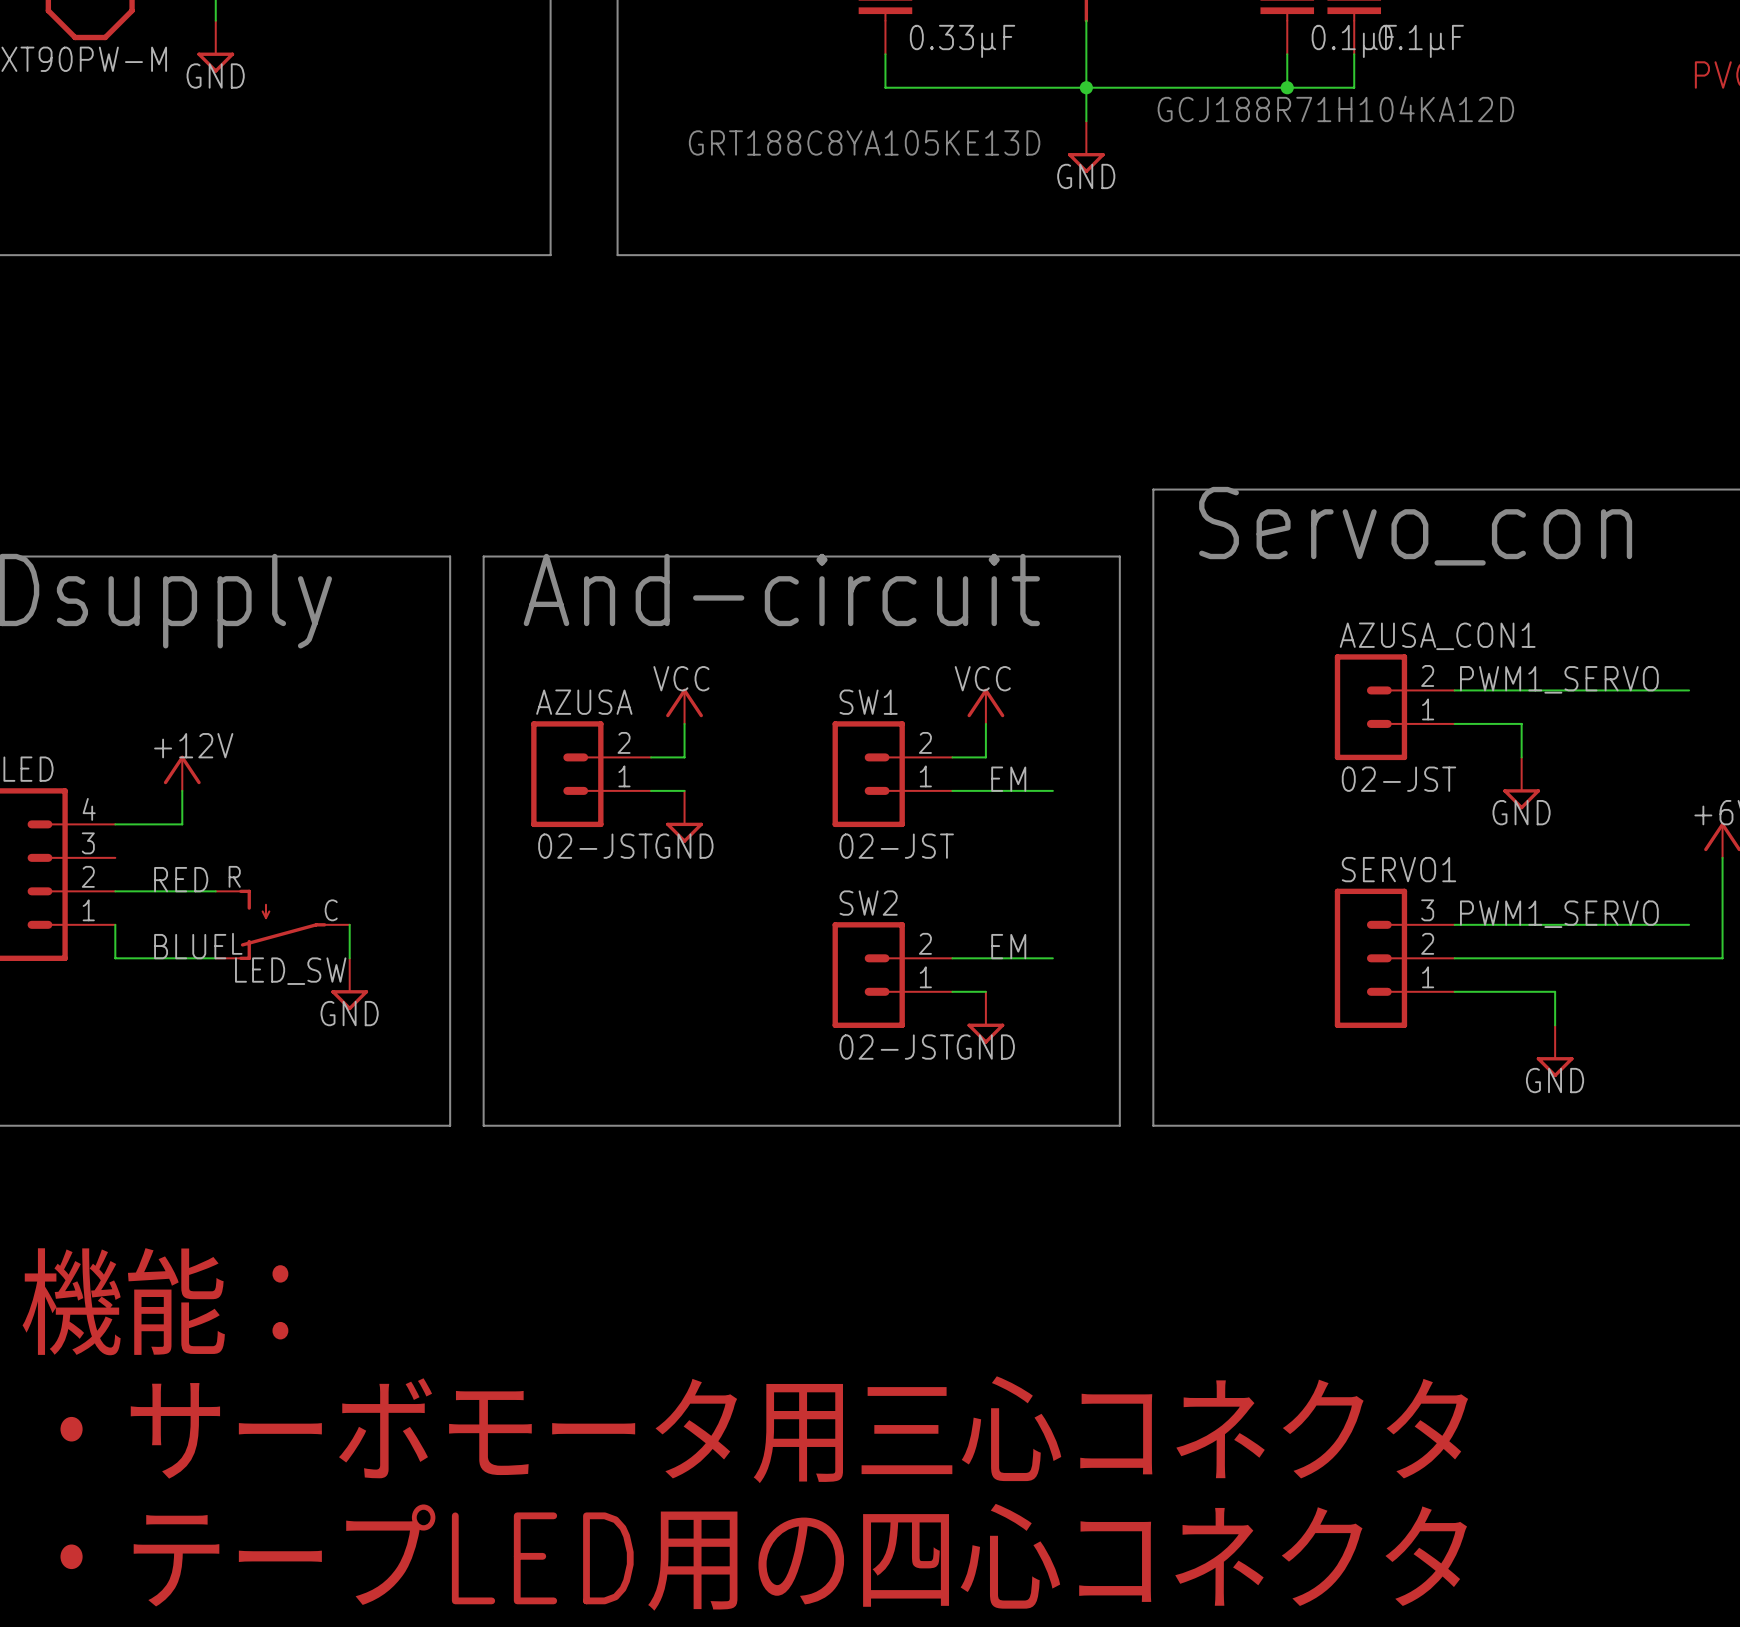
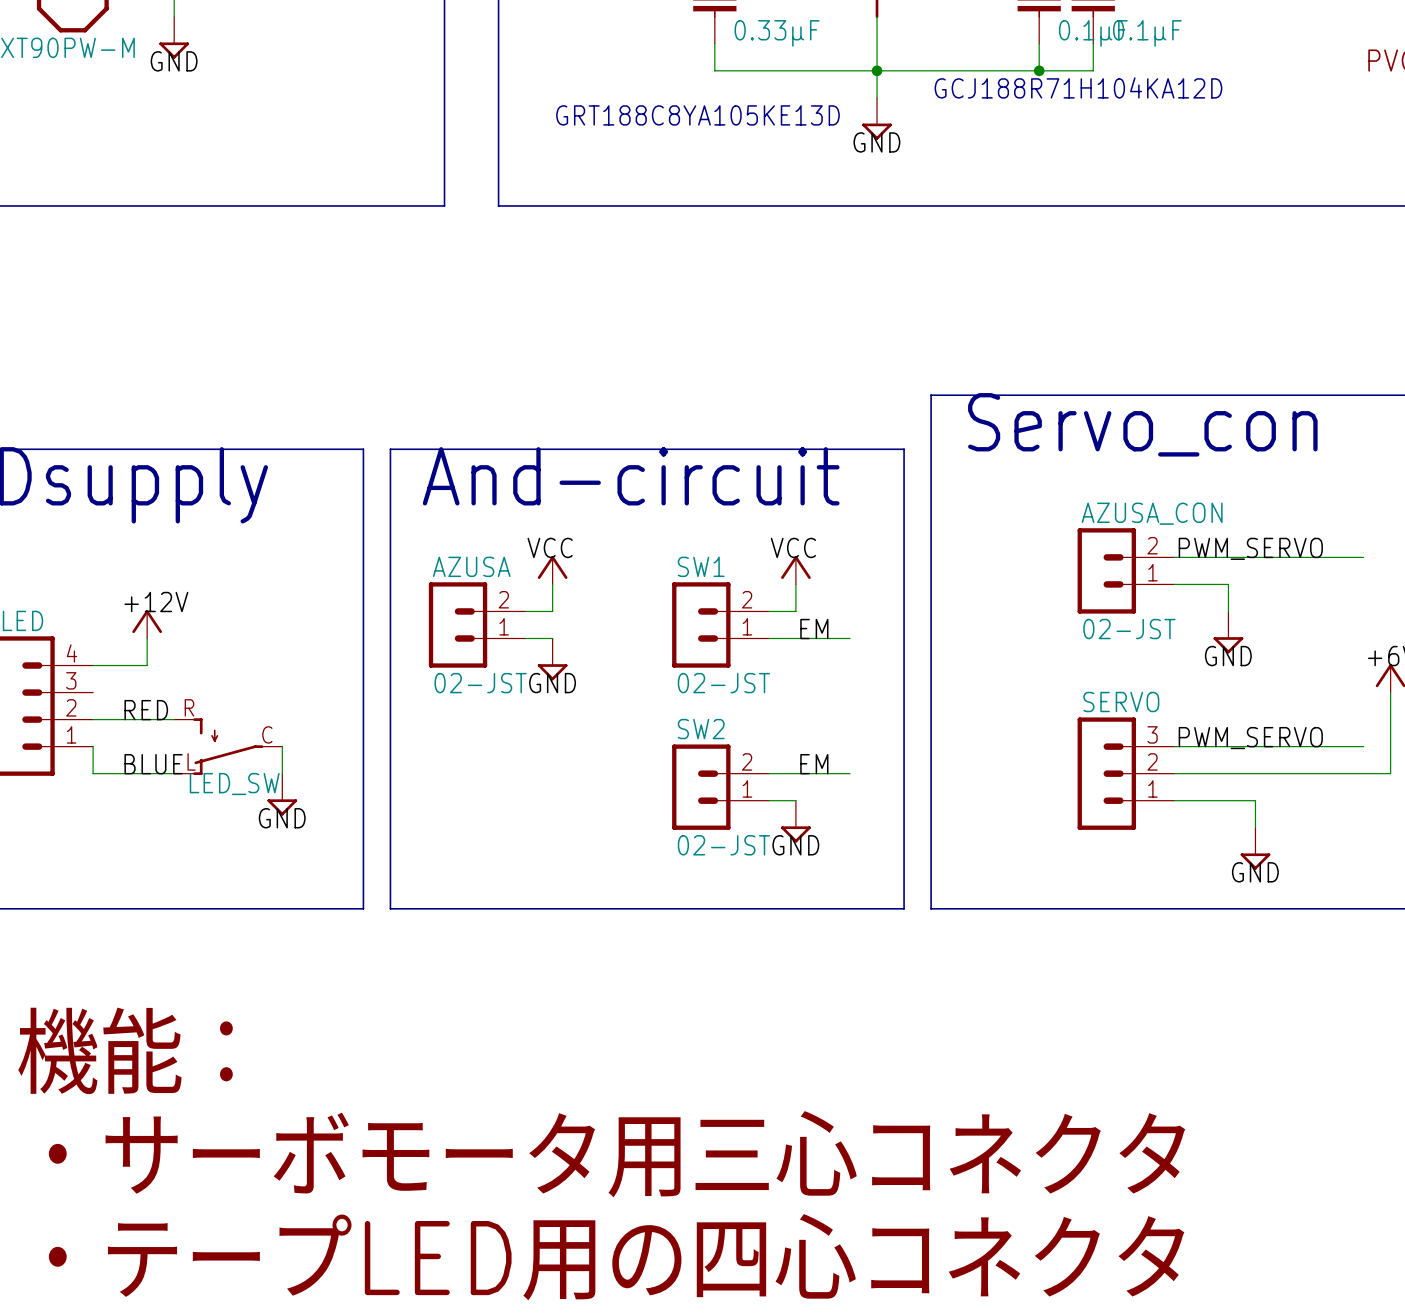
AZUSA_CON1 name: AZUSA_CON1 (1437, 636) -> AZUSA_CON (1152, 513)
label: PWM1_SERVO (1559, 679) -> PWM_SERVO (1250, 548)
SERVO1 name: SERVO1 (1398, 869) -> SERVO (1121, 702)
label: PWM1_SERVO (1559, 914) -> PWM_SERVO (1250, 738)

